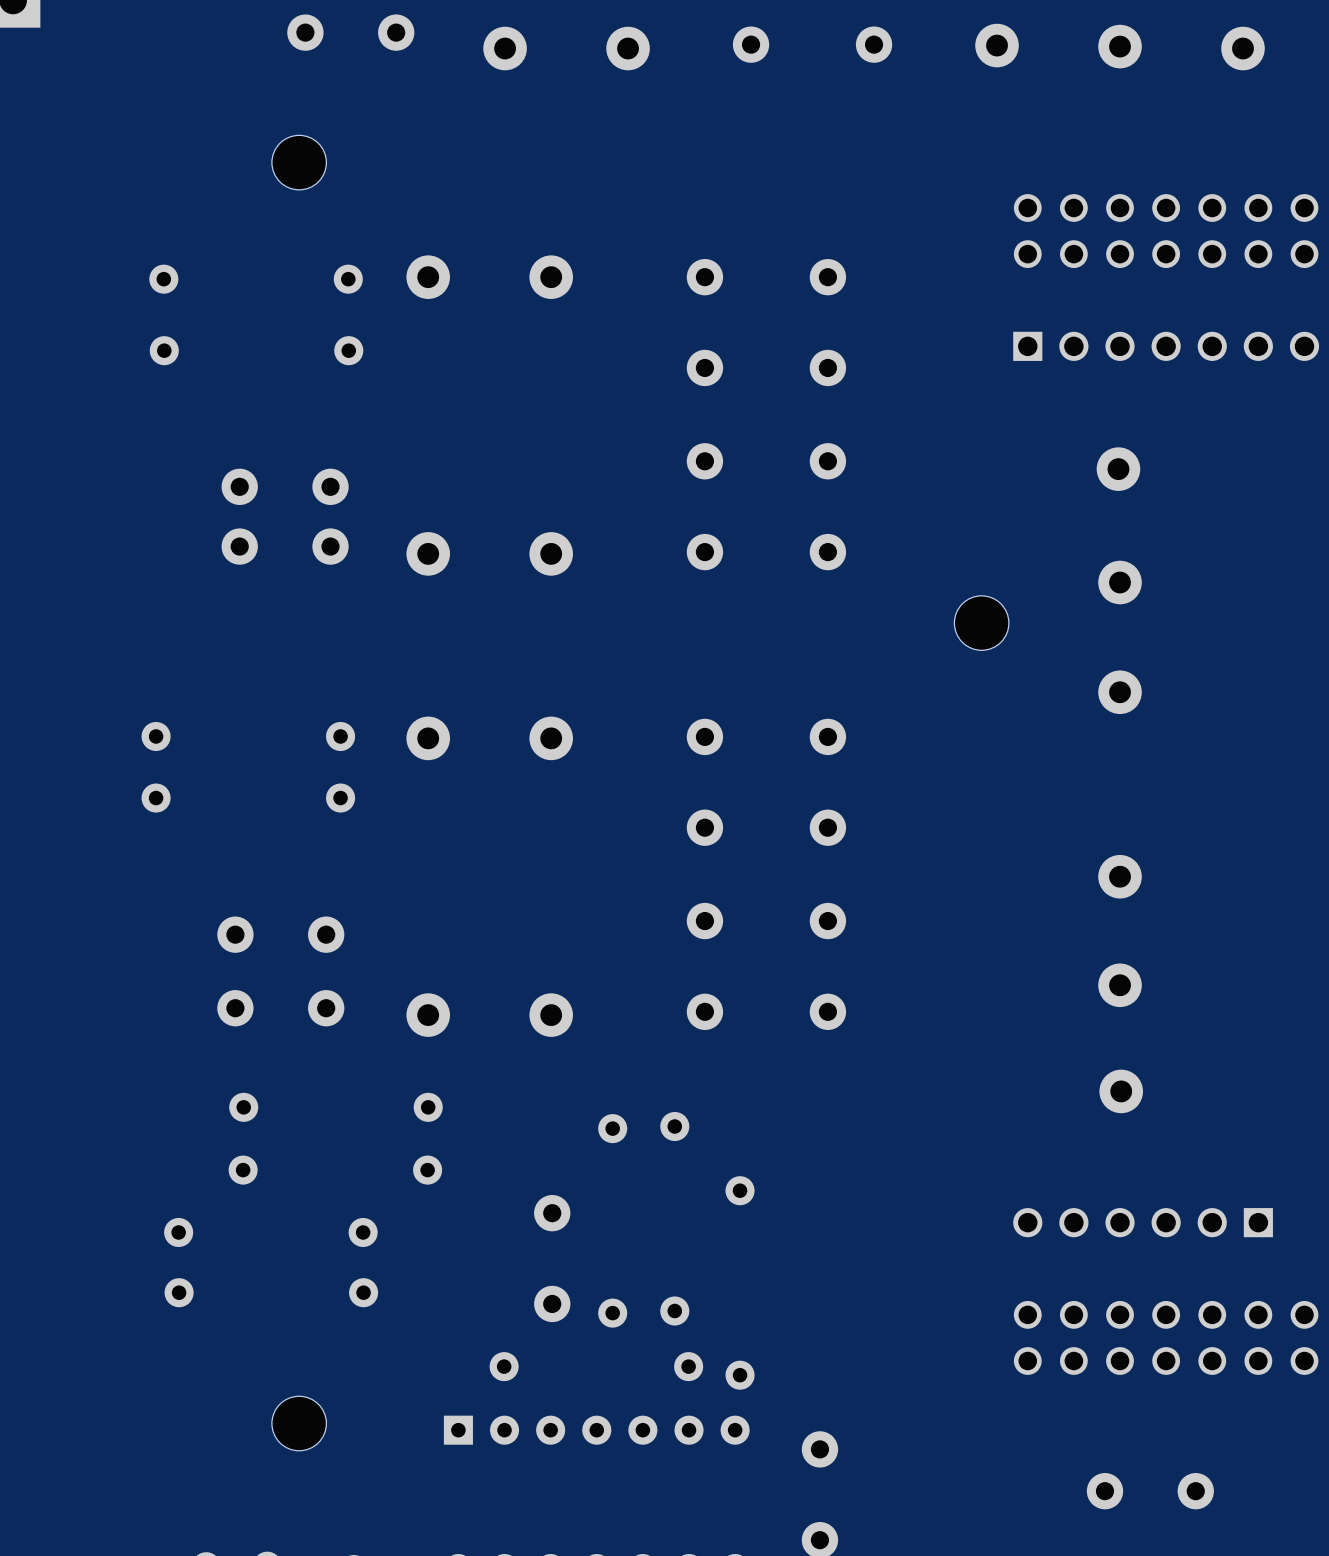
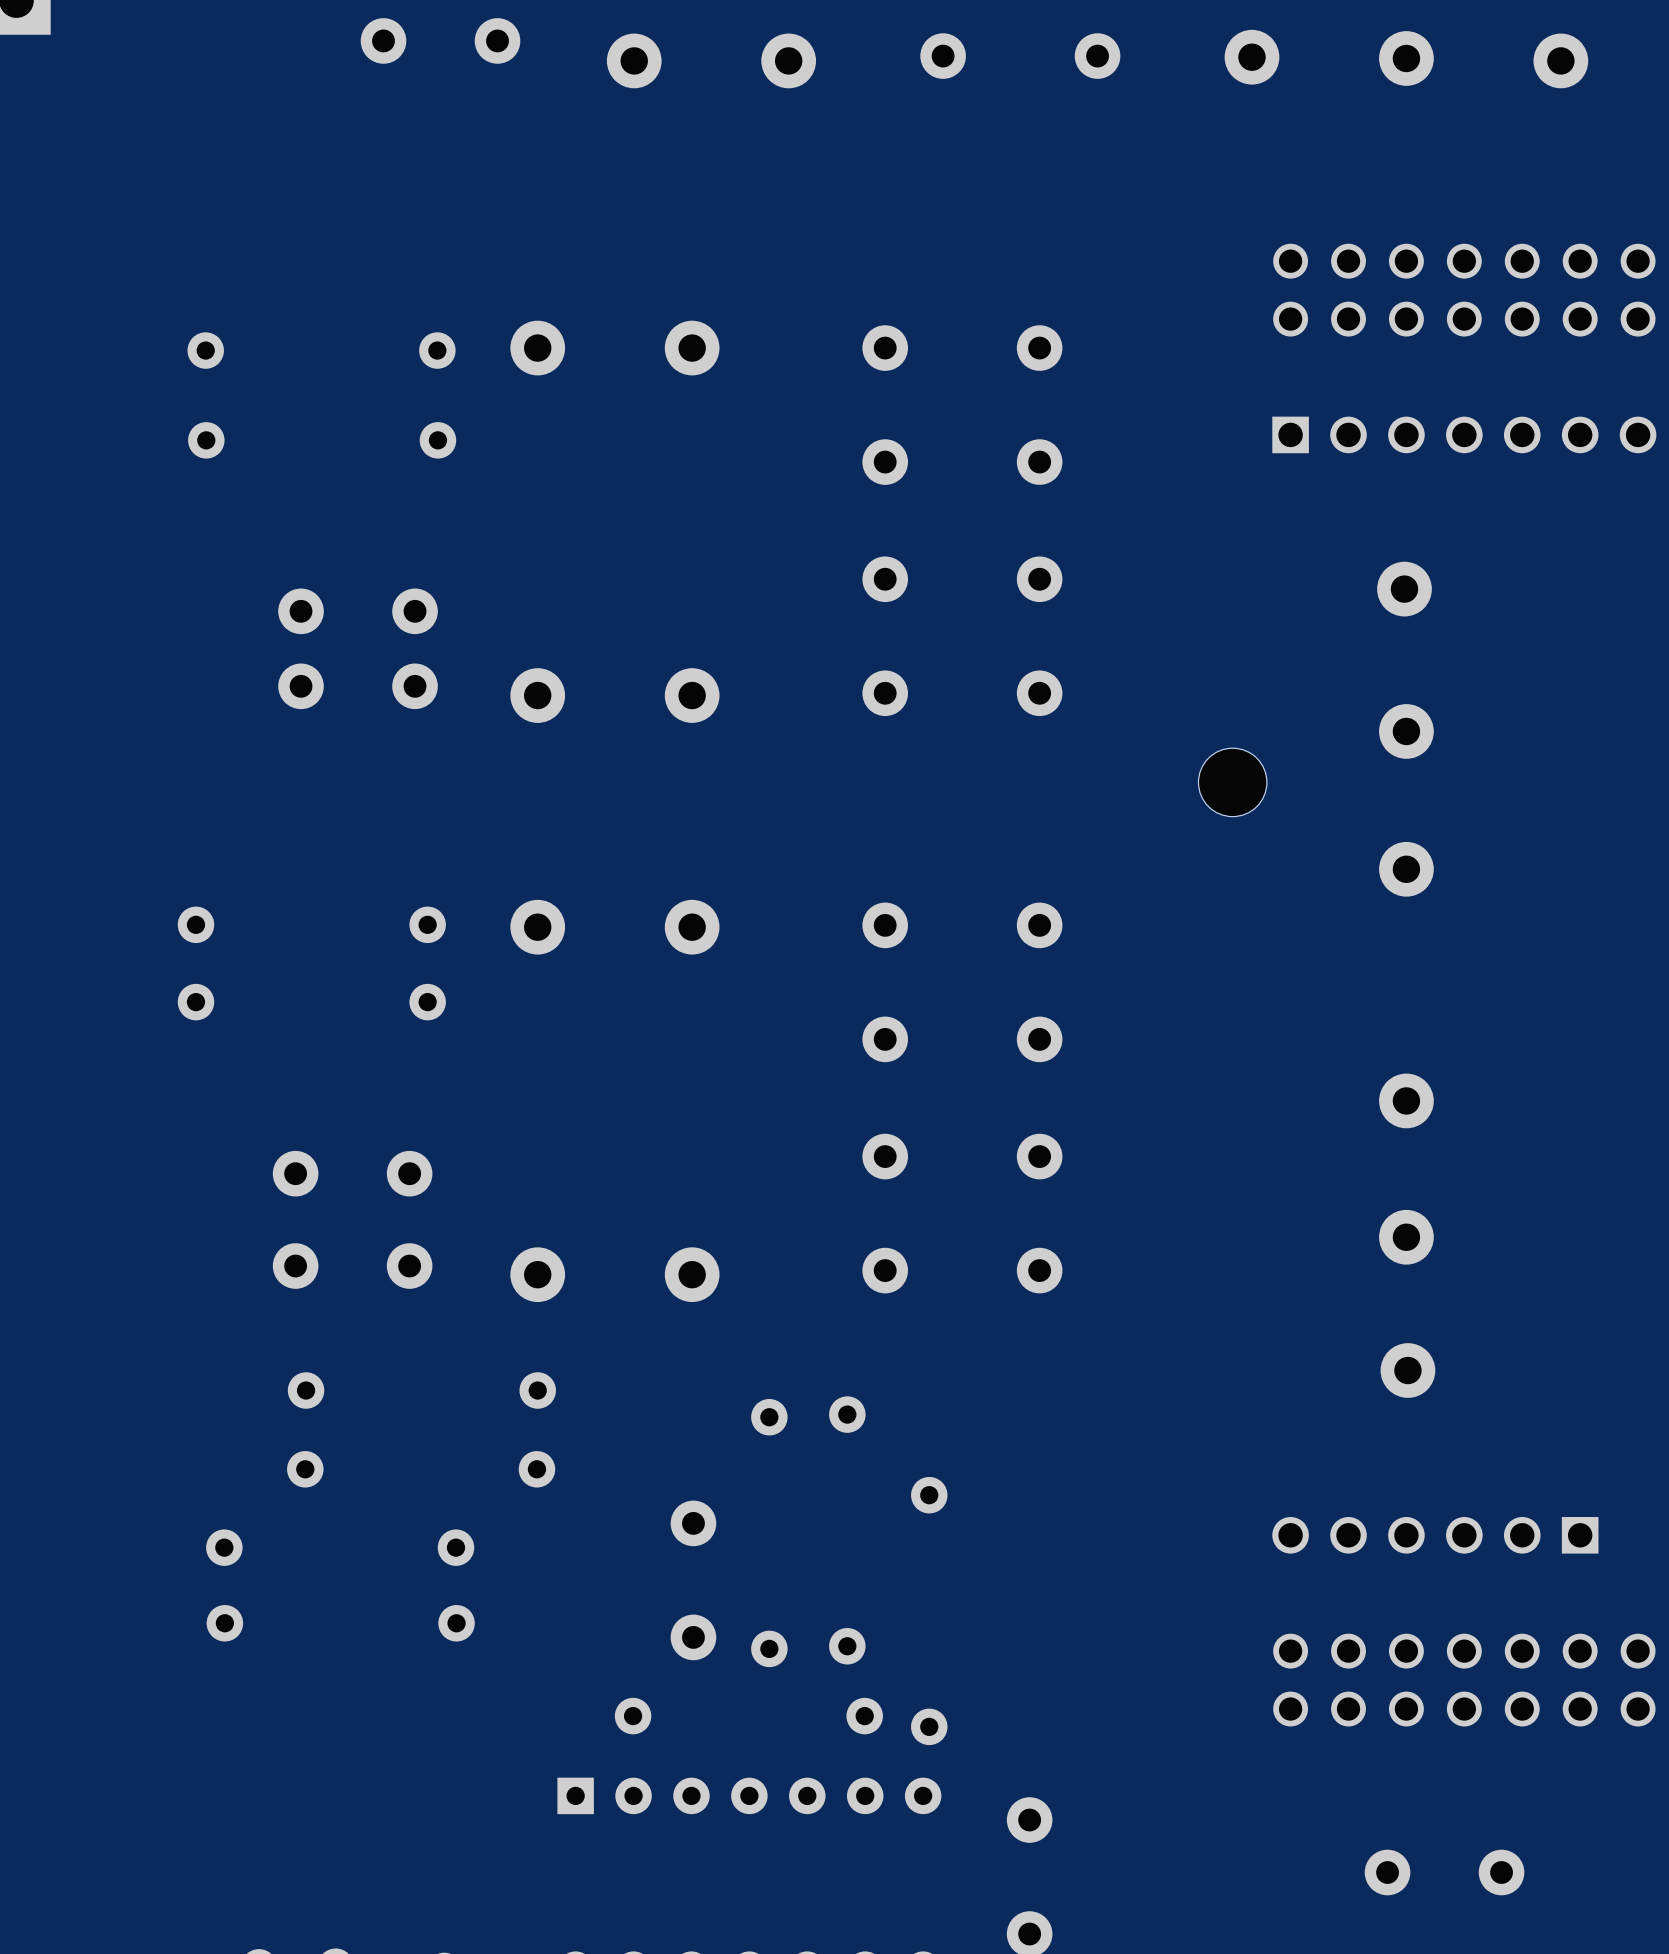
part: (299, 162) -> none
part: (299, 1423) -> none

